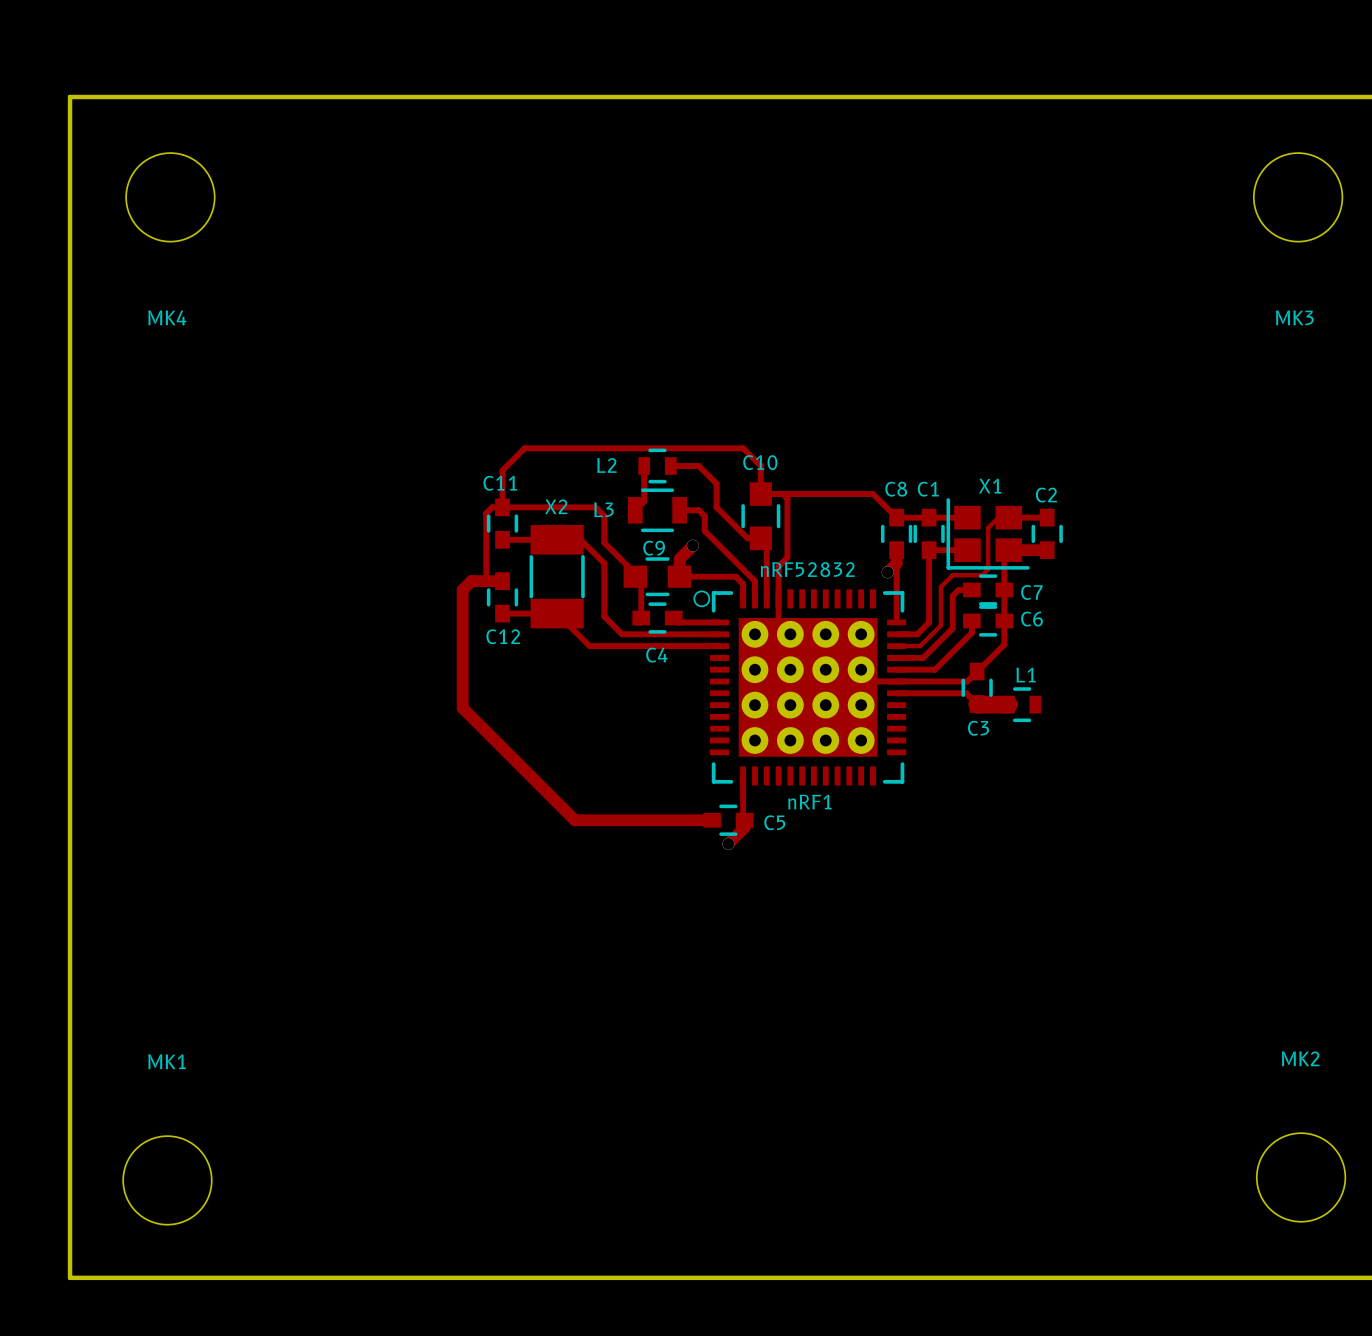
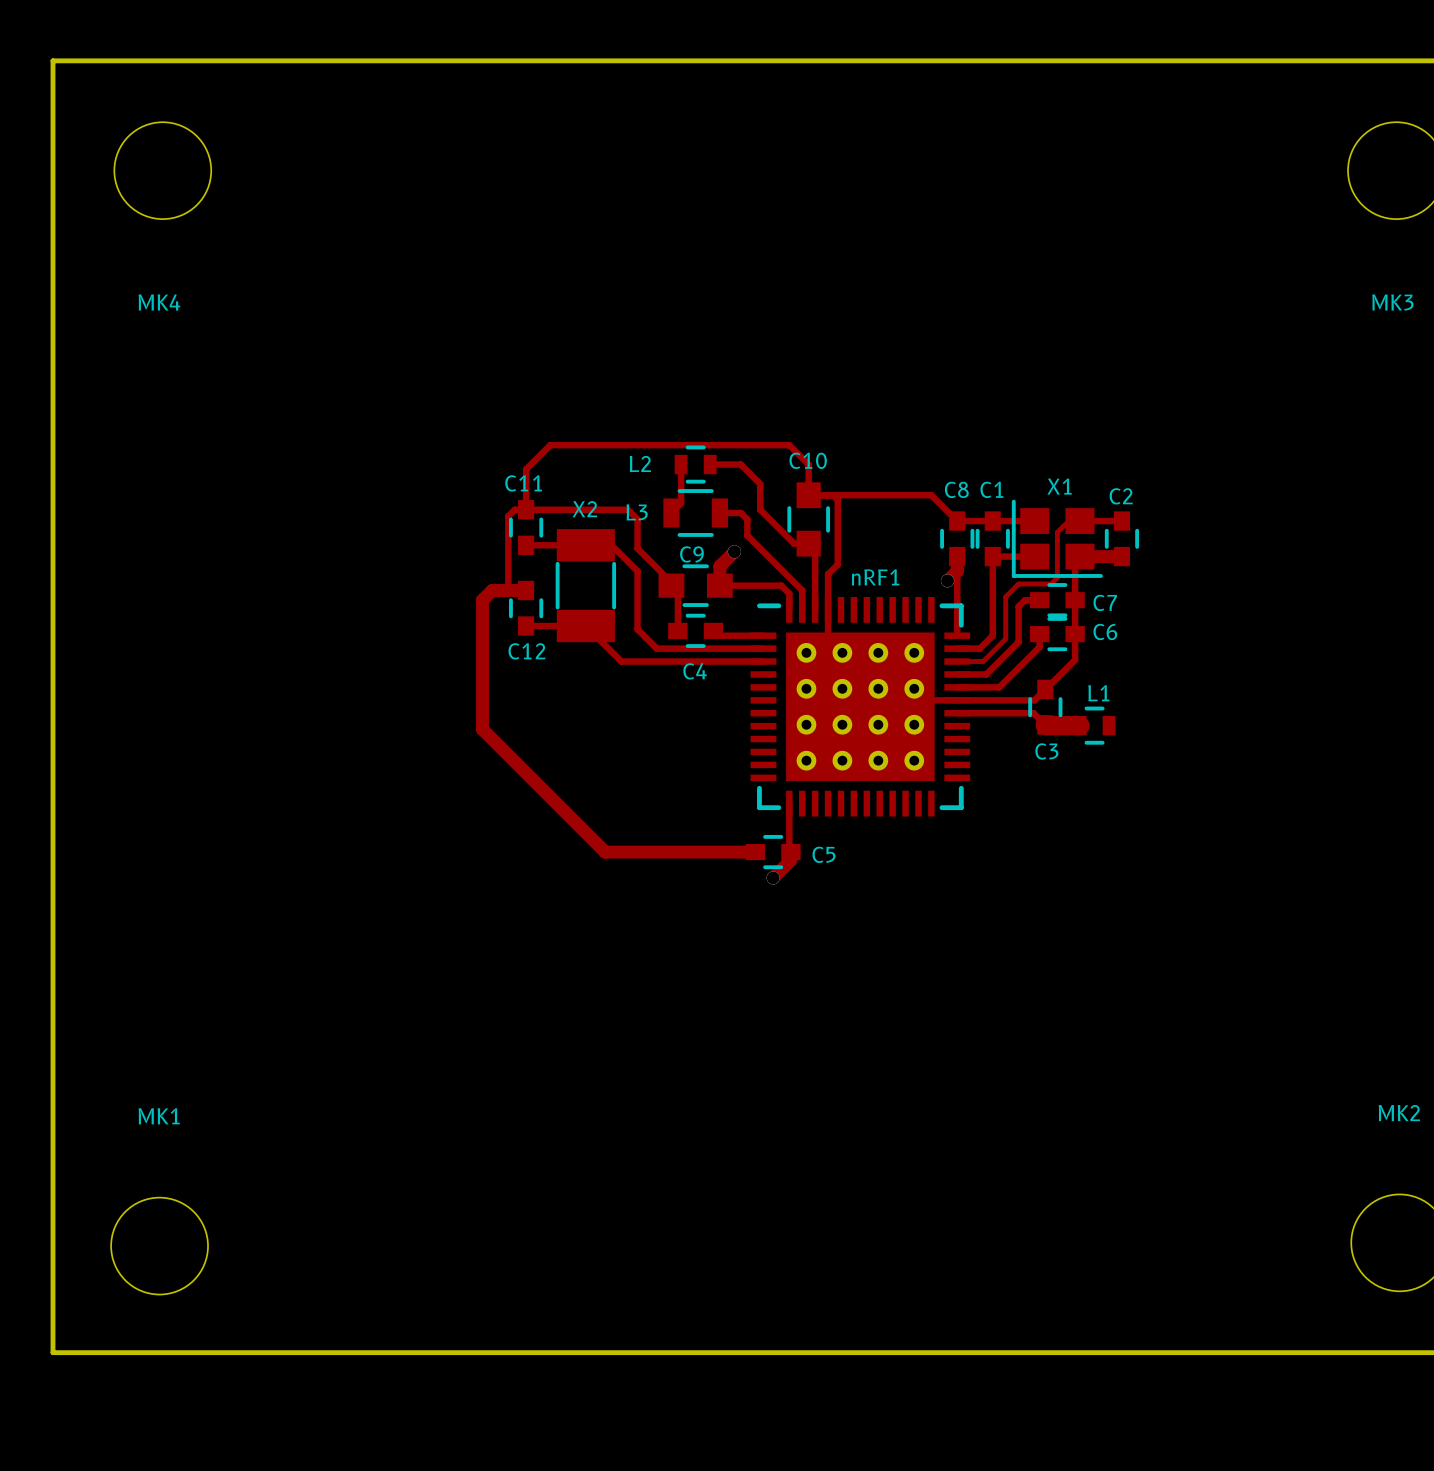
nRF1 value: nRF52832 (807, 569) -> none
nRF1 footprint: [694, 589, 907, 786] -> [750, 596, 971, 817]
nRF1 name position: nRF1 (810, 801) -> nRF1 (875, 577)

